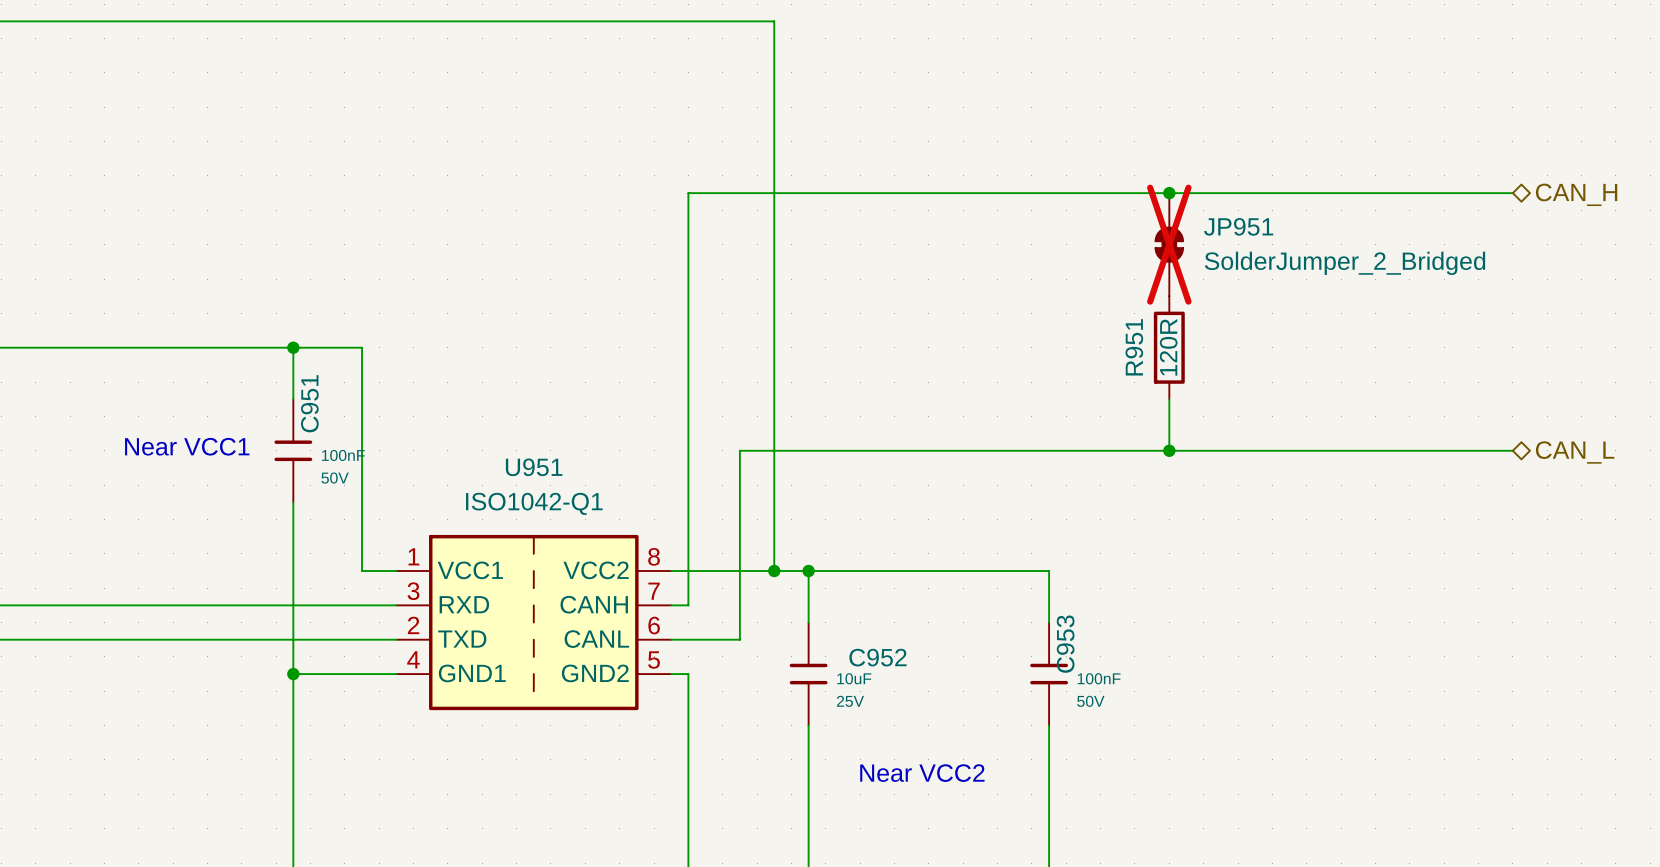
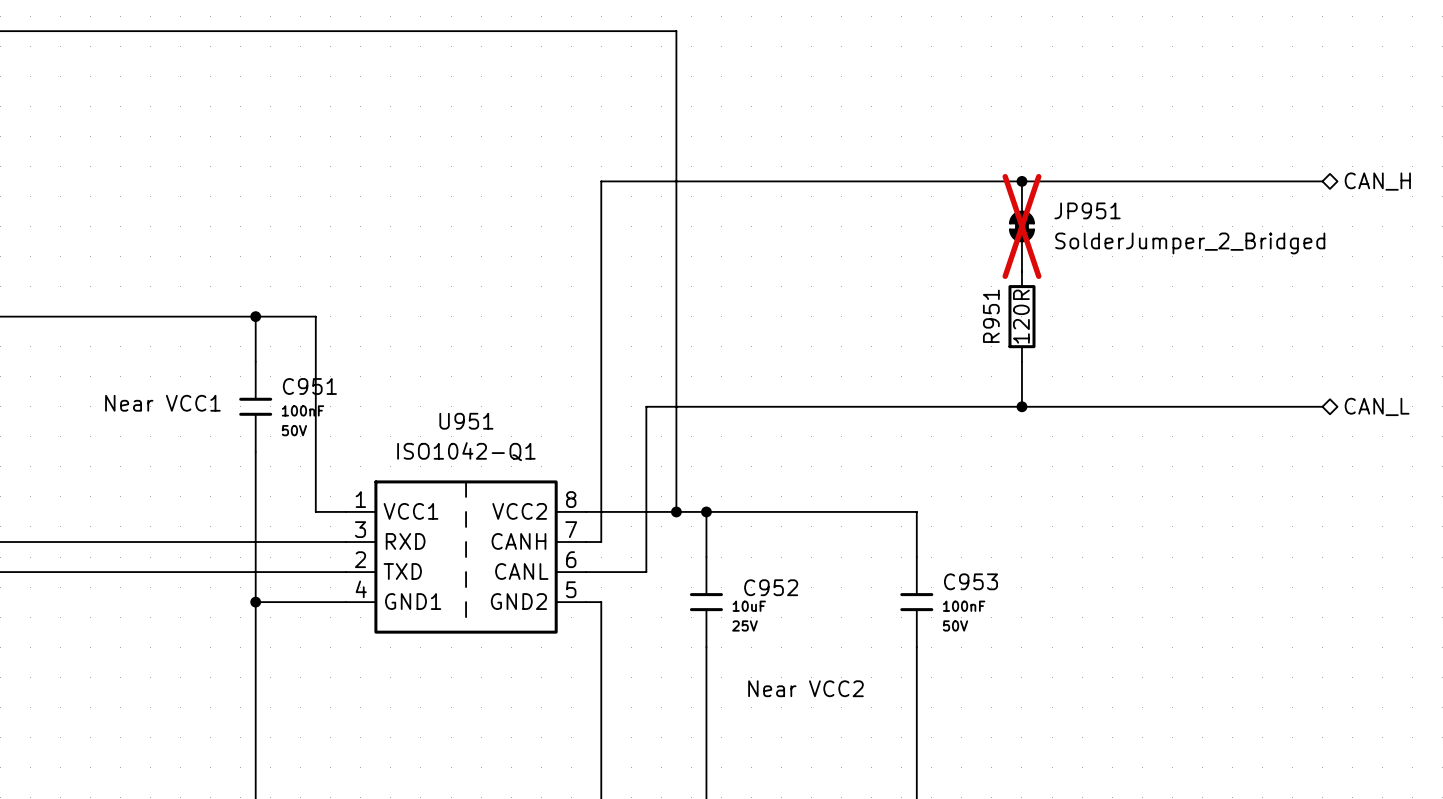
C951 name rotation: 0° (309, 403) -> 90° clockwise (309, 386)
C953 name rotation: 0° (1065, 644) -> 90° clockwise (971, 581)

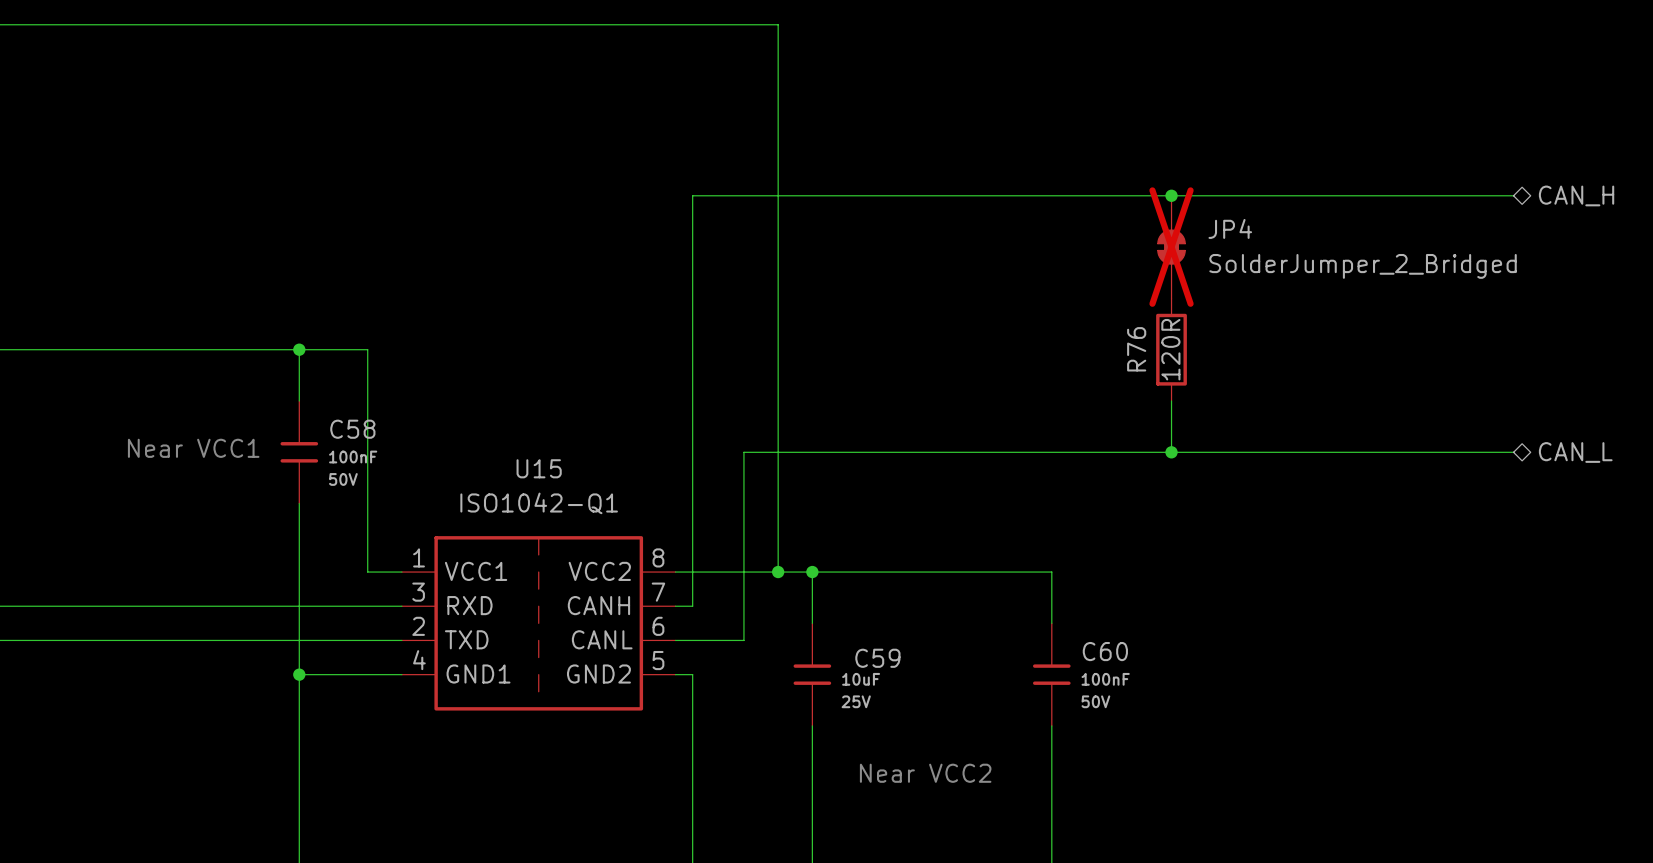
JP951 name: JP951 (1087, 210) -> JP4 (1230, 228)
R951 name: R951 (991, 316) -> R76 (1136, 349)
C951 name: C951 (309, 386) -> C58 (352, 429)
U951 name: U951 (466, 421) -> U15 (539, 468)
C953 name: C953 (971, 581) -> C60 (1105, 651)
C952 name: C952 (771, 587) -> C59 (877, 658)

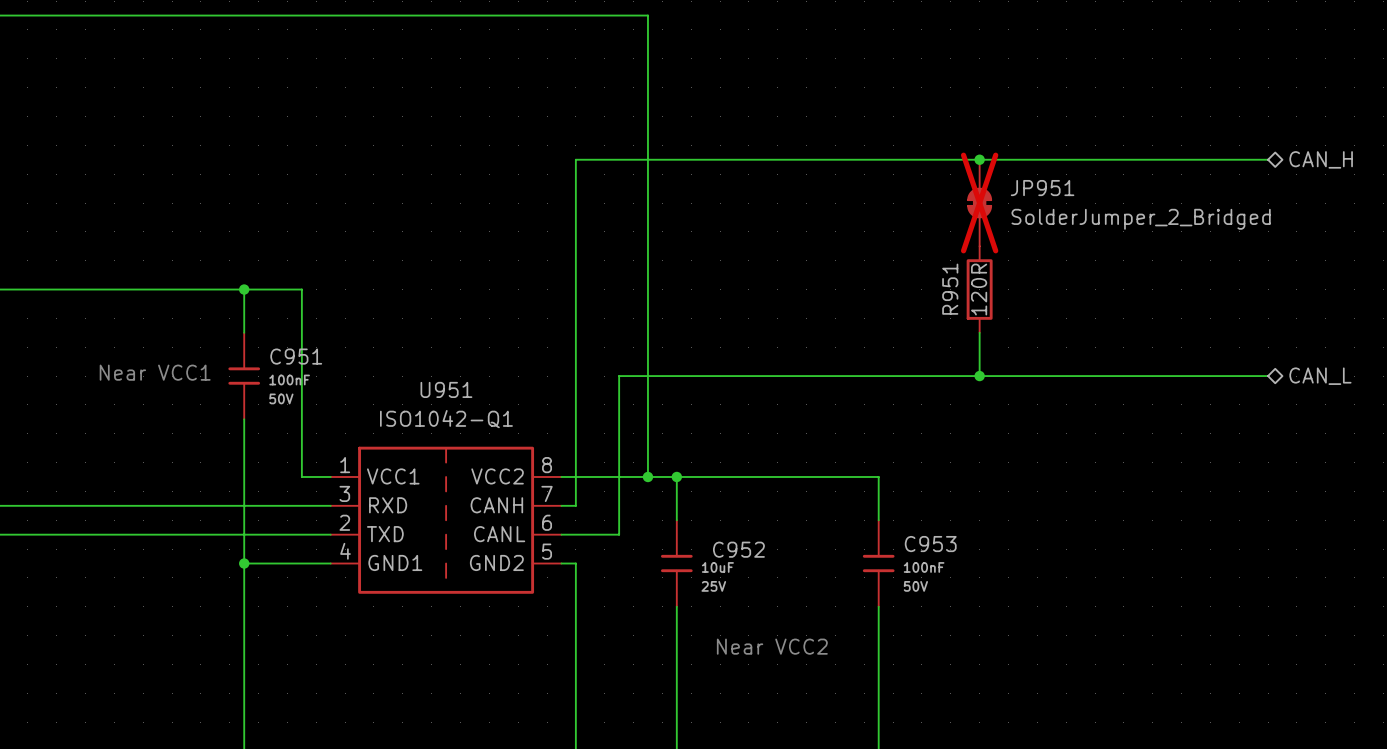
JP4 name: JP4 (1230, 228) -> JP951 (1042, 188)
R76 name: R76 (1136, 349) -> R951 (950, 289)
C58 name: C58 (352, 429) -> C951 (296, 356)
U15 name: U15 (539, 468) -> U951 (446, 389)
C60 name: C60 (1105, 651) -> C953 (930, 544)
C59 name: C59 (877, 658) -> C952 (738, 549)

